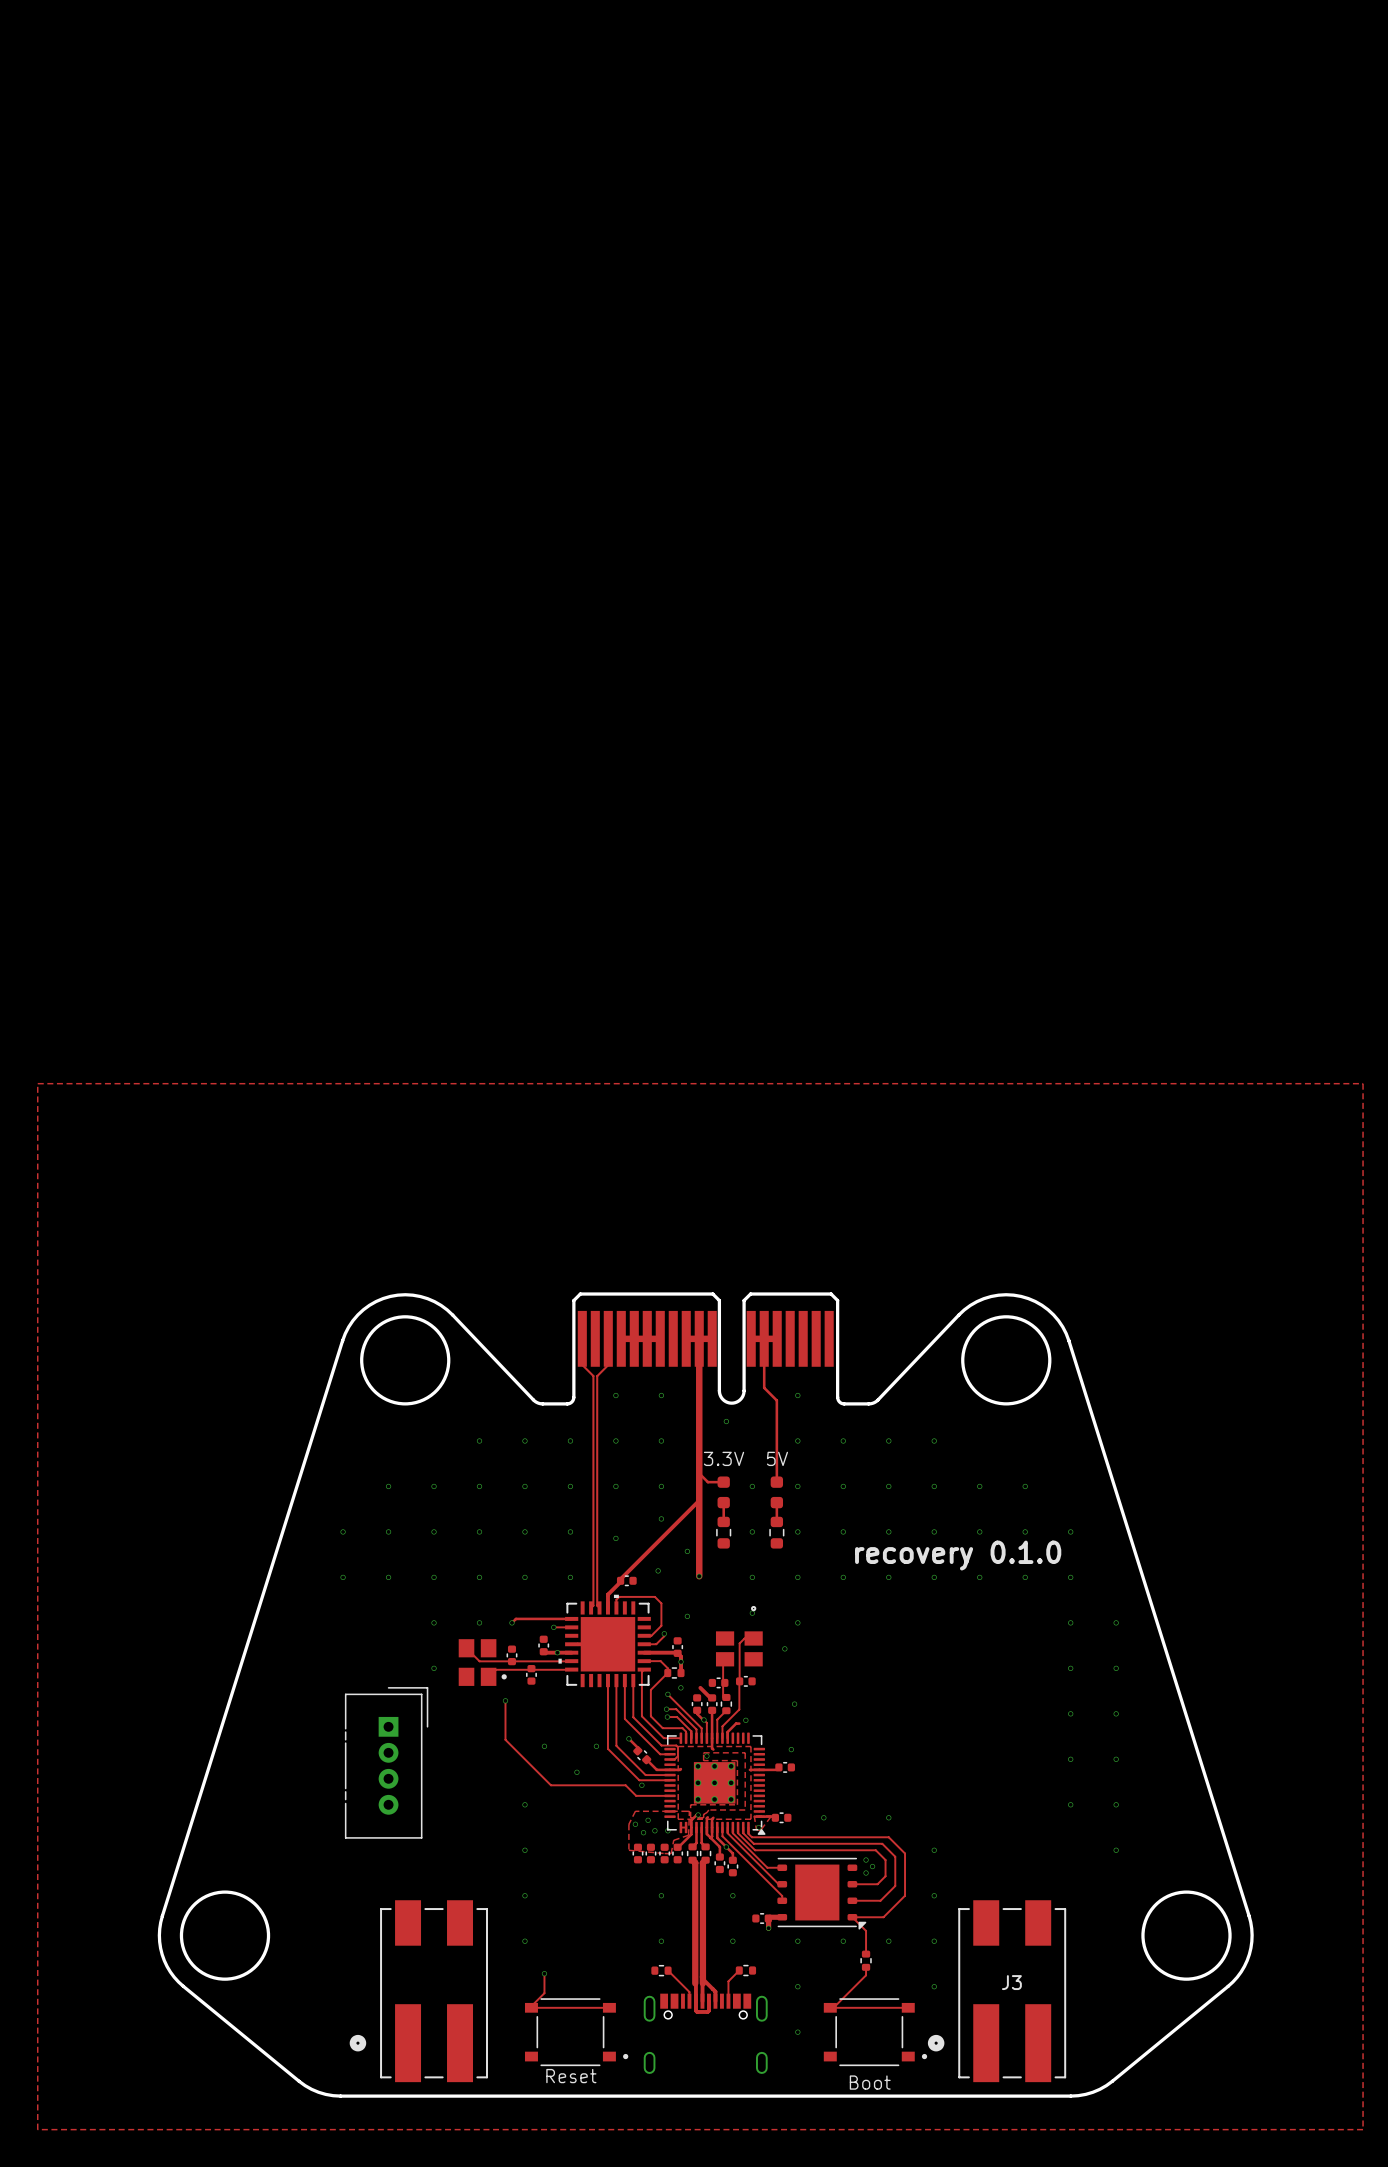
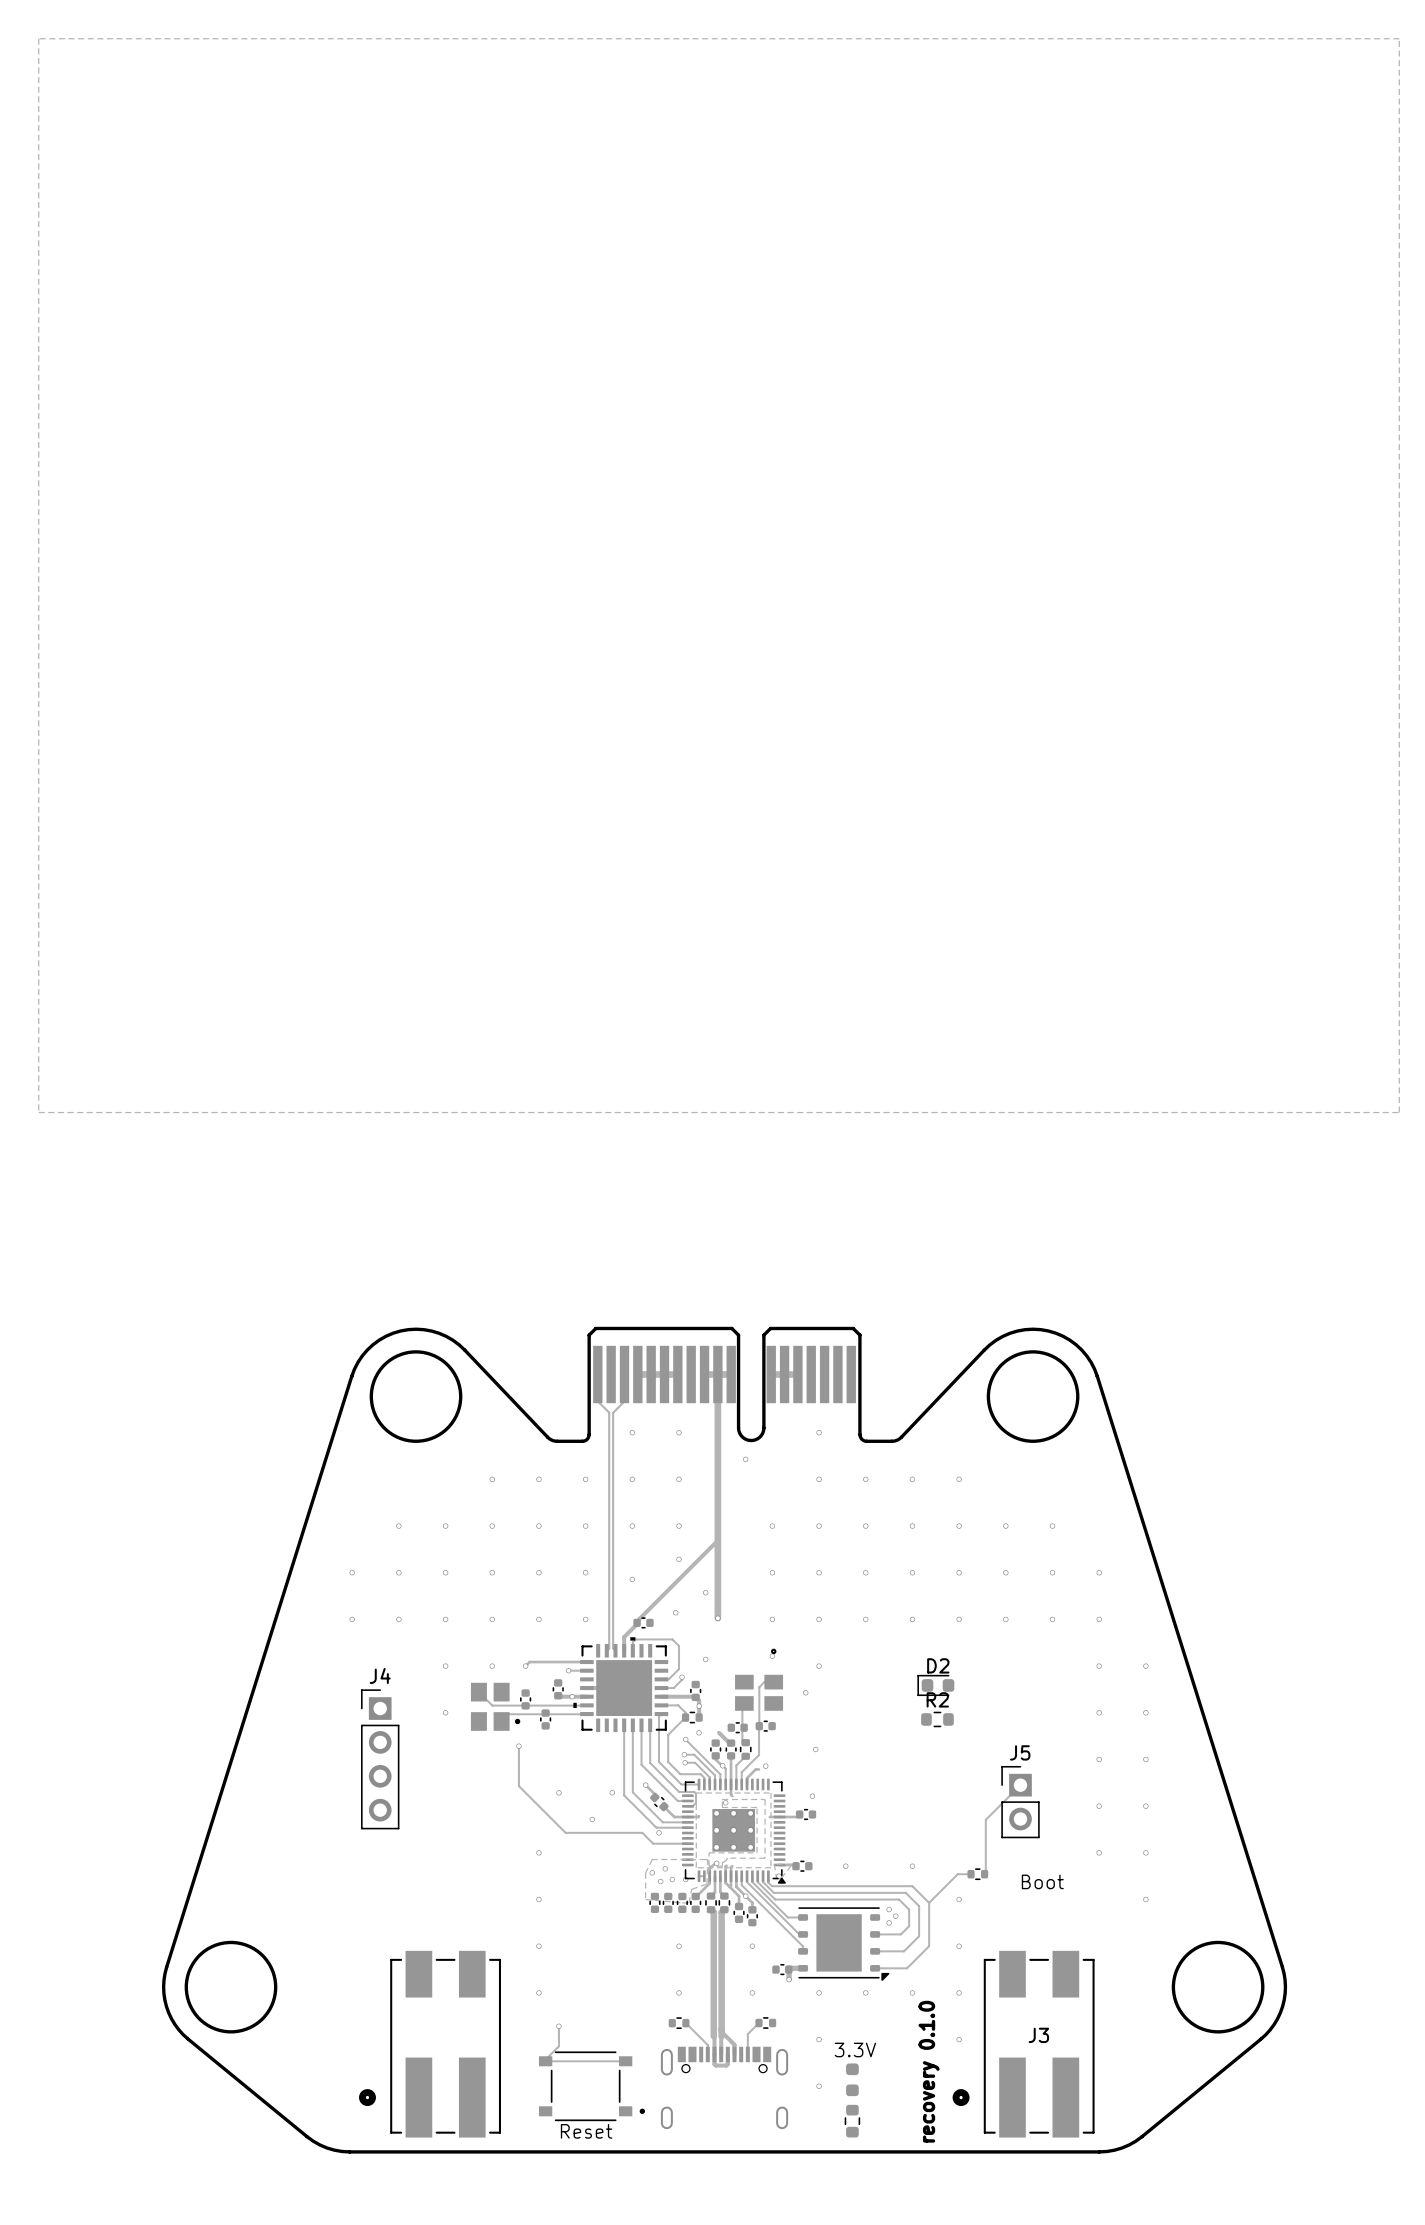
zone outline: (37, 1083) (37, 2129) (1363, 2129) (1363, 1083) -> (38, 1112) (38, 38) (1399, 38) (1399, 1112)
track: (764, 1338) (764, 1387) (776, 1400) (776, 1482) -> none
text: 3.3V (724, 1458) -> none
text: 5V (777, 1458) -> none
track: (699, 1473) (707, 1482) (723, 1482) -> none
part: (723, 1492) -> none
part: (776, 1492) -> none
track: (723, 1502) (723, 1521) -> none
track: (776, 1502) (776, 1521) -> none
part: (723, 1532) -> none
part: (776, 1532) -> none
text: recovery 0.1.0 (958, 1555) -> none
D2: none -> (935, 1685)
R2: none -> (937, 1719)
J4: none -> (380, 1759)
track: none -> (1020, 1785) (985, 1819) (985, 1872)
J5: none -> (1020, 1802)
part: (386, 1762) -> none
track: none -> (971, 1874) (957, 1874) (929, 1902)
track: (852, 1917) (866, 1930) (866, 1954) -> none
part rotation: 0° (866, 1960) -> 90° clockwise (977, 1874)
part position: (866, 1960) -> (977, 1874)
track: (866, 1967) (866, 1975) (833, 2007) -> none
text: none -> 3.3V (855, 2049)
track: (830, 2007) (908, 2007) -> none
text: none -> recovery 0.1.0 (929, 2071)
part: none -> (852, 2079)
part: (875, 2032) -> none
part: none -> (852, 2121)
text position: Boot (870, 2082) -> Boot (1042, 1881)

